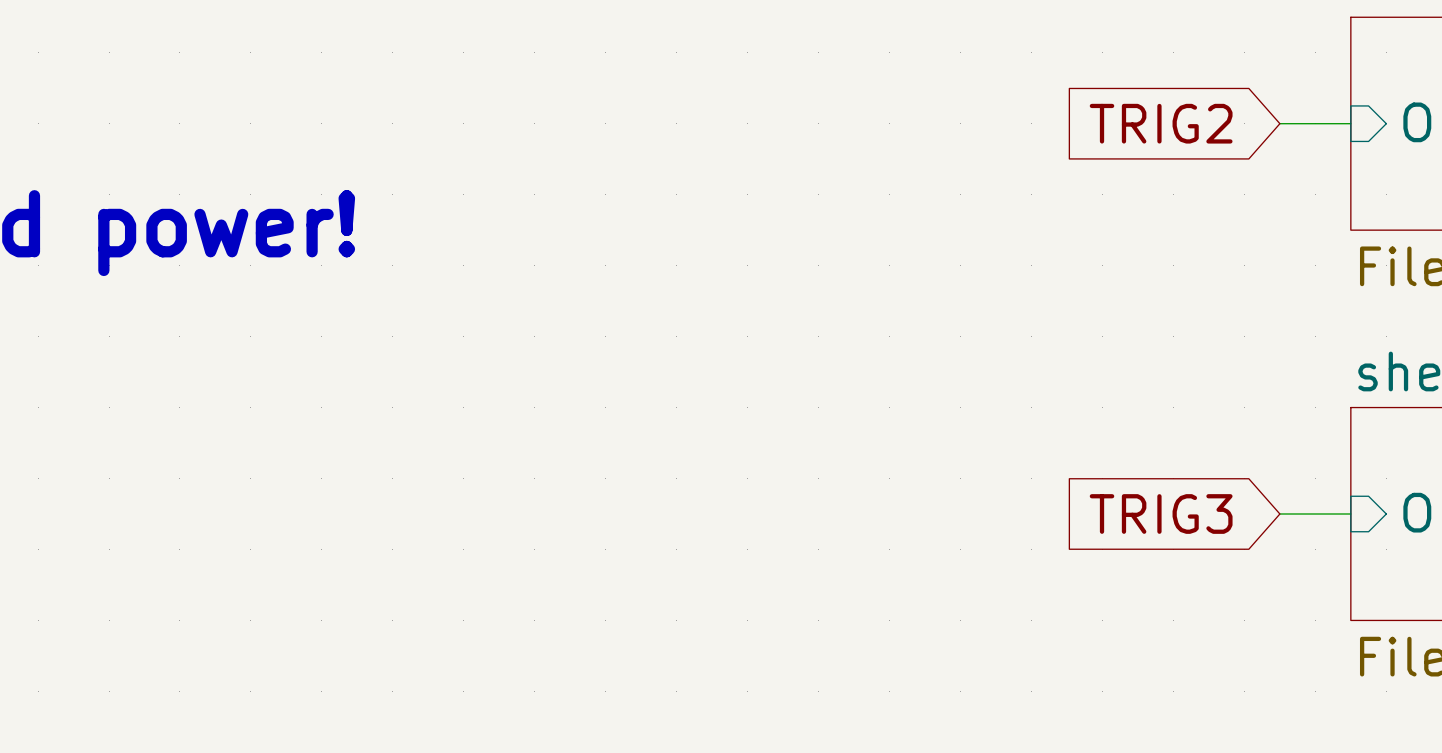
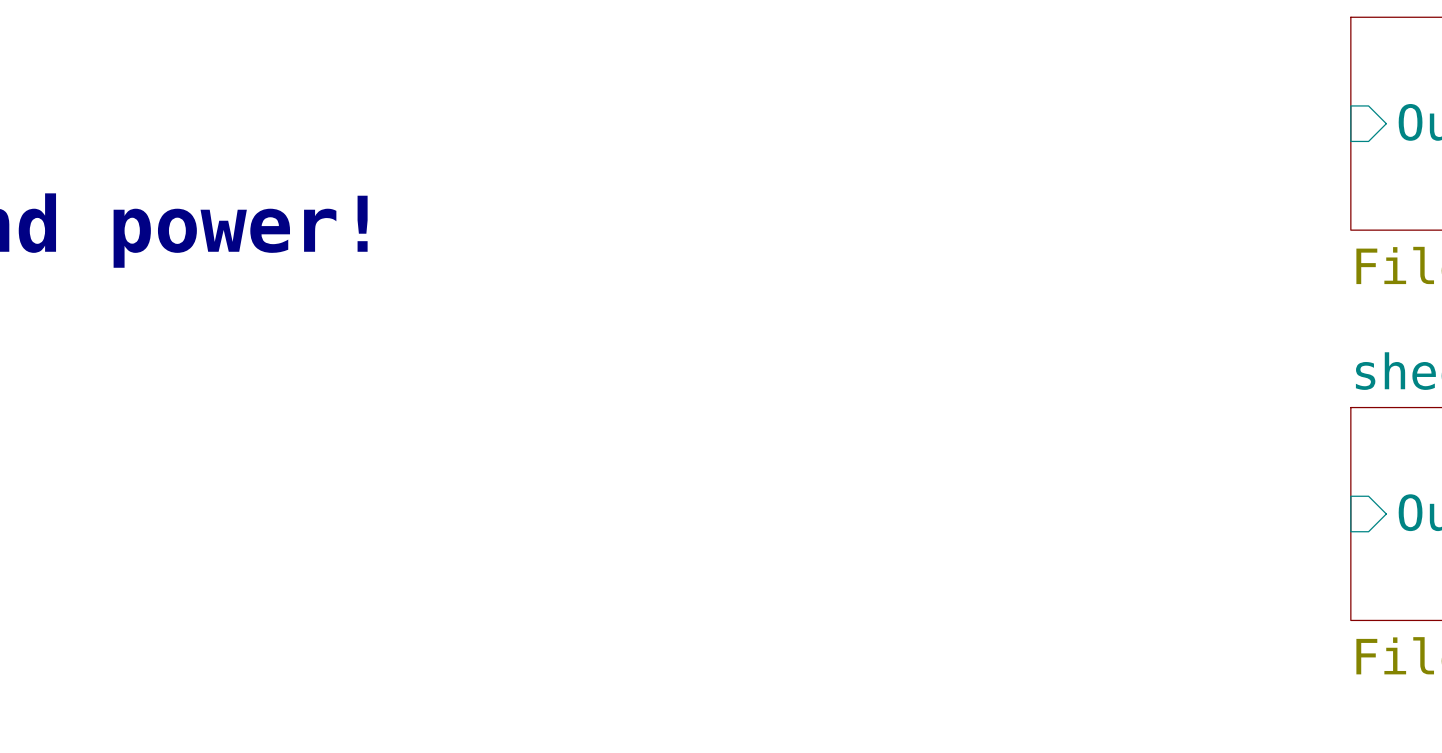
global label: TRIG2 (1161, 123) -> none
wire: (1279, 123) (1350, 123) -> none
global label: TRIG3 (1161, 513) -> none
wire: (1279, 513) (1350, 513) -> none

